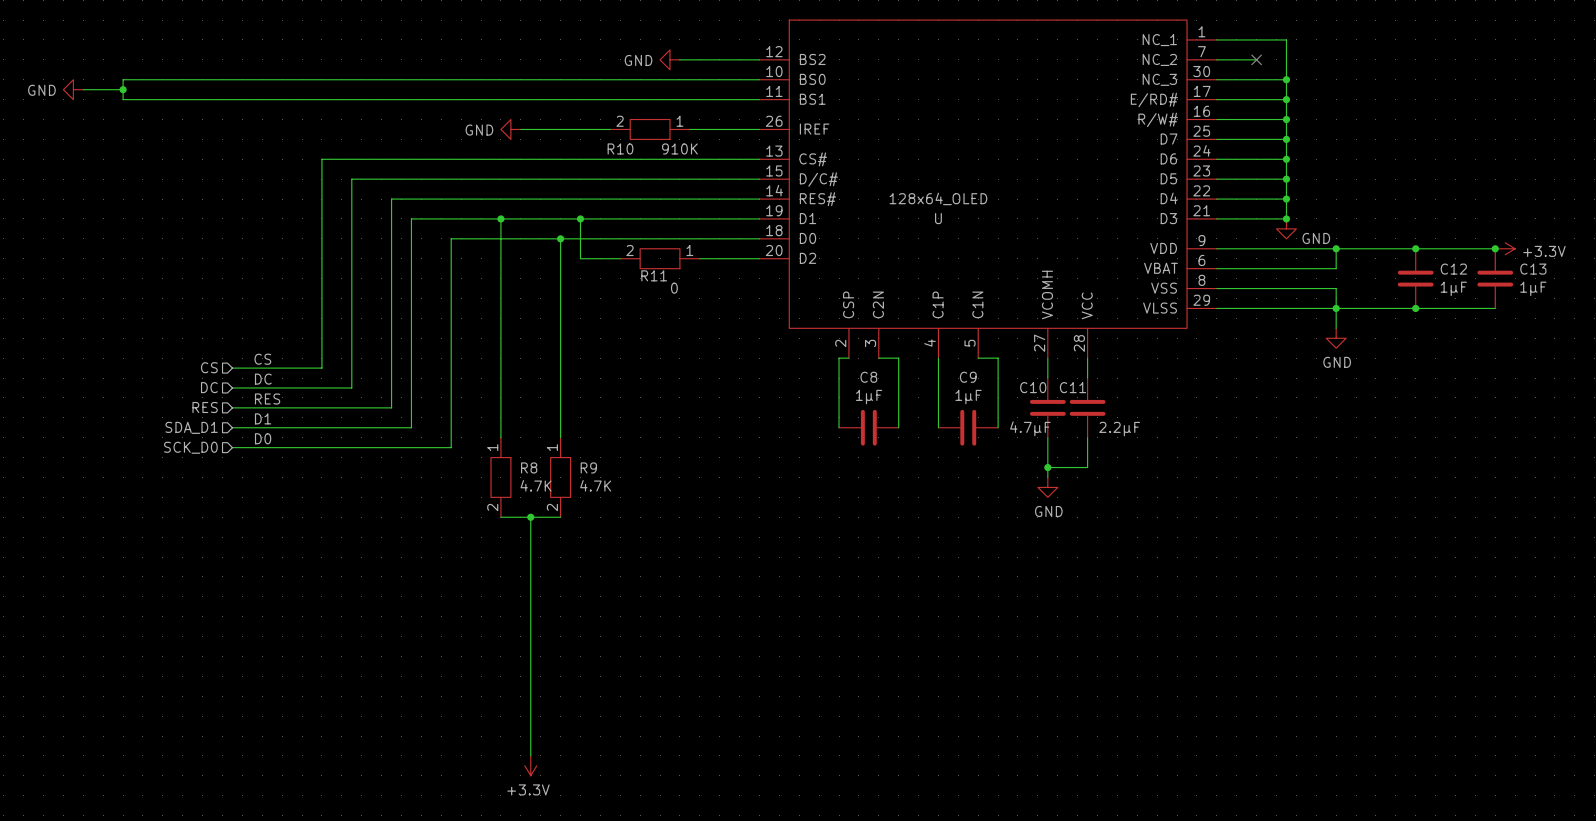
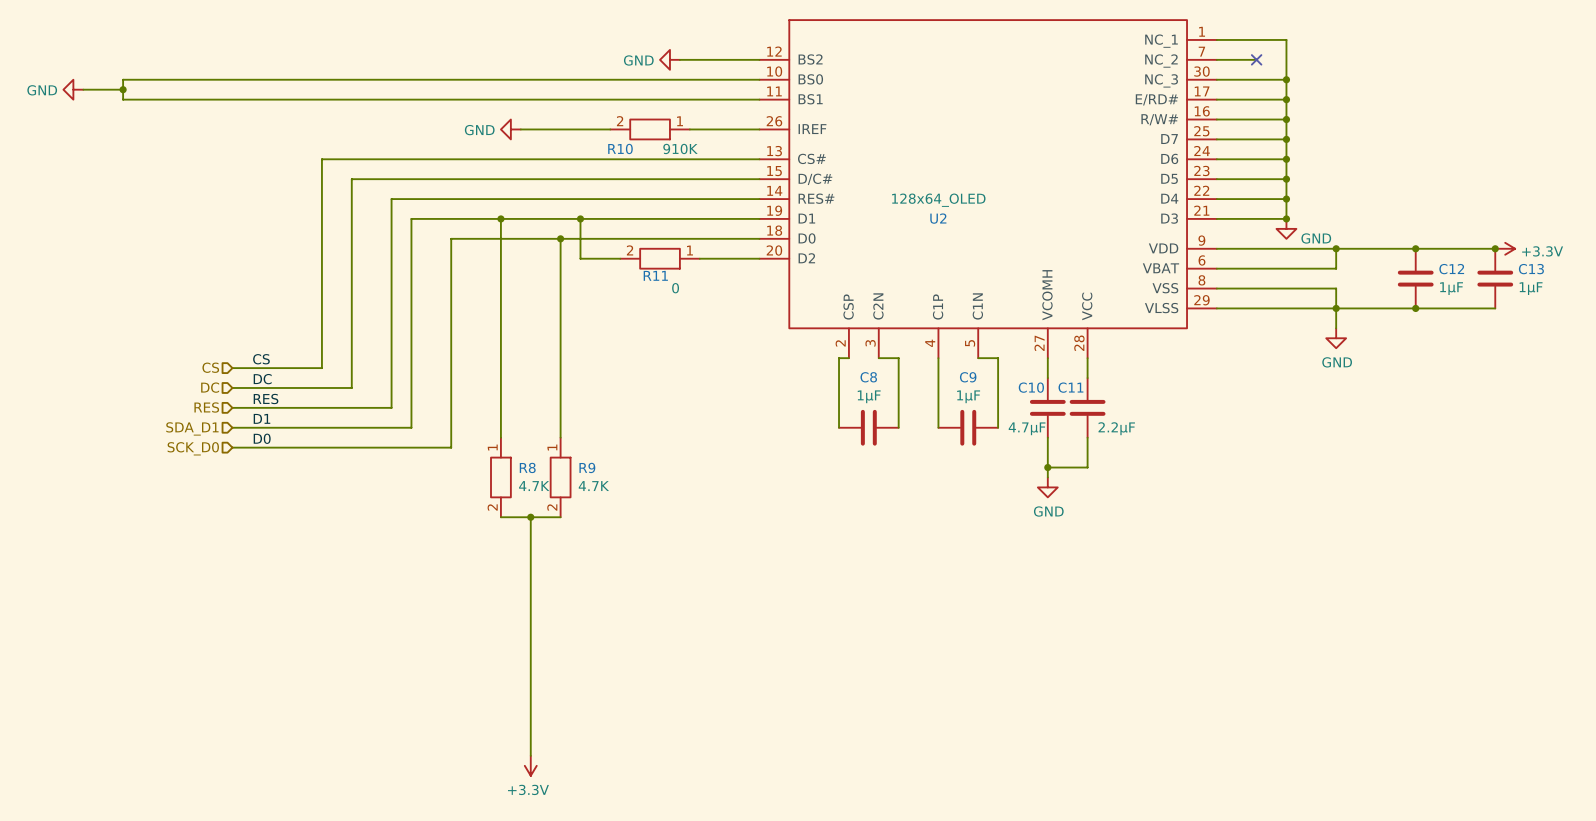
U name: U (938, 218) -> U2 (938, 218)

